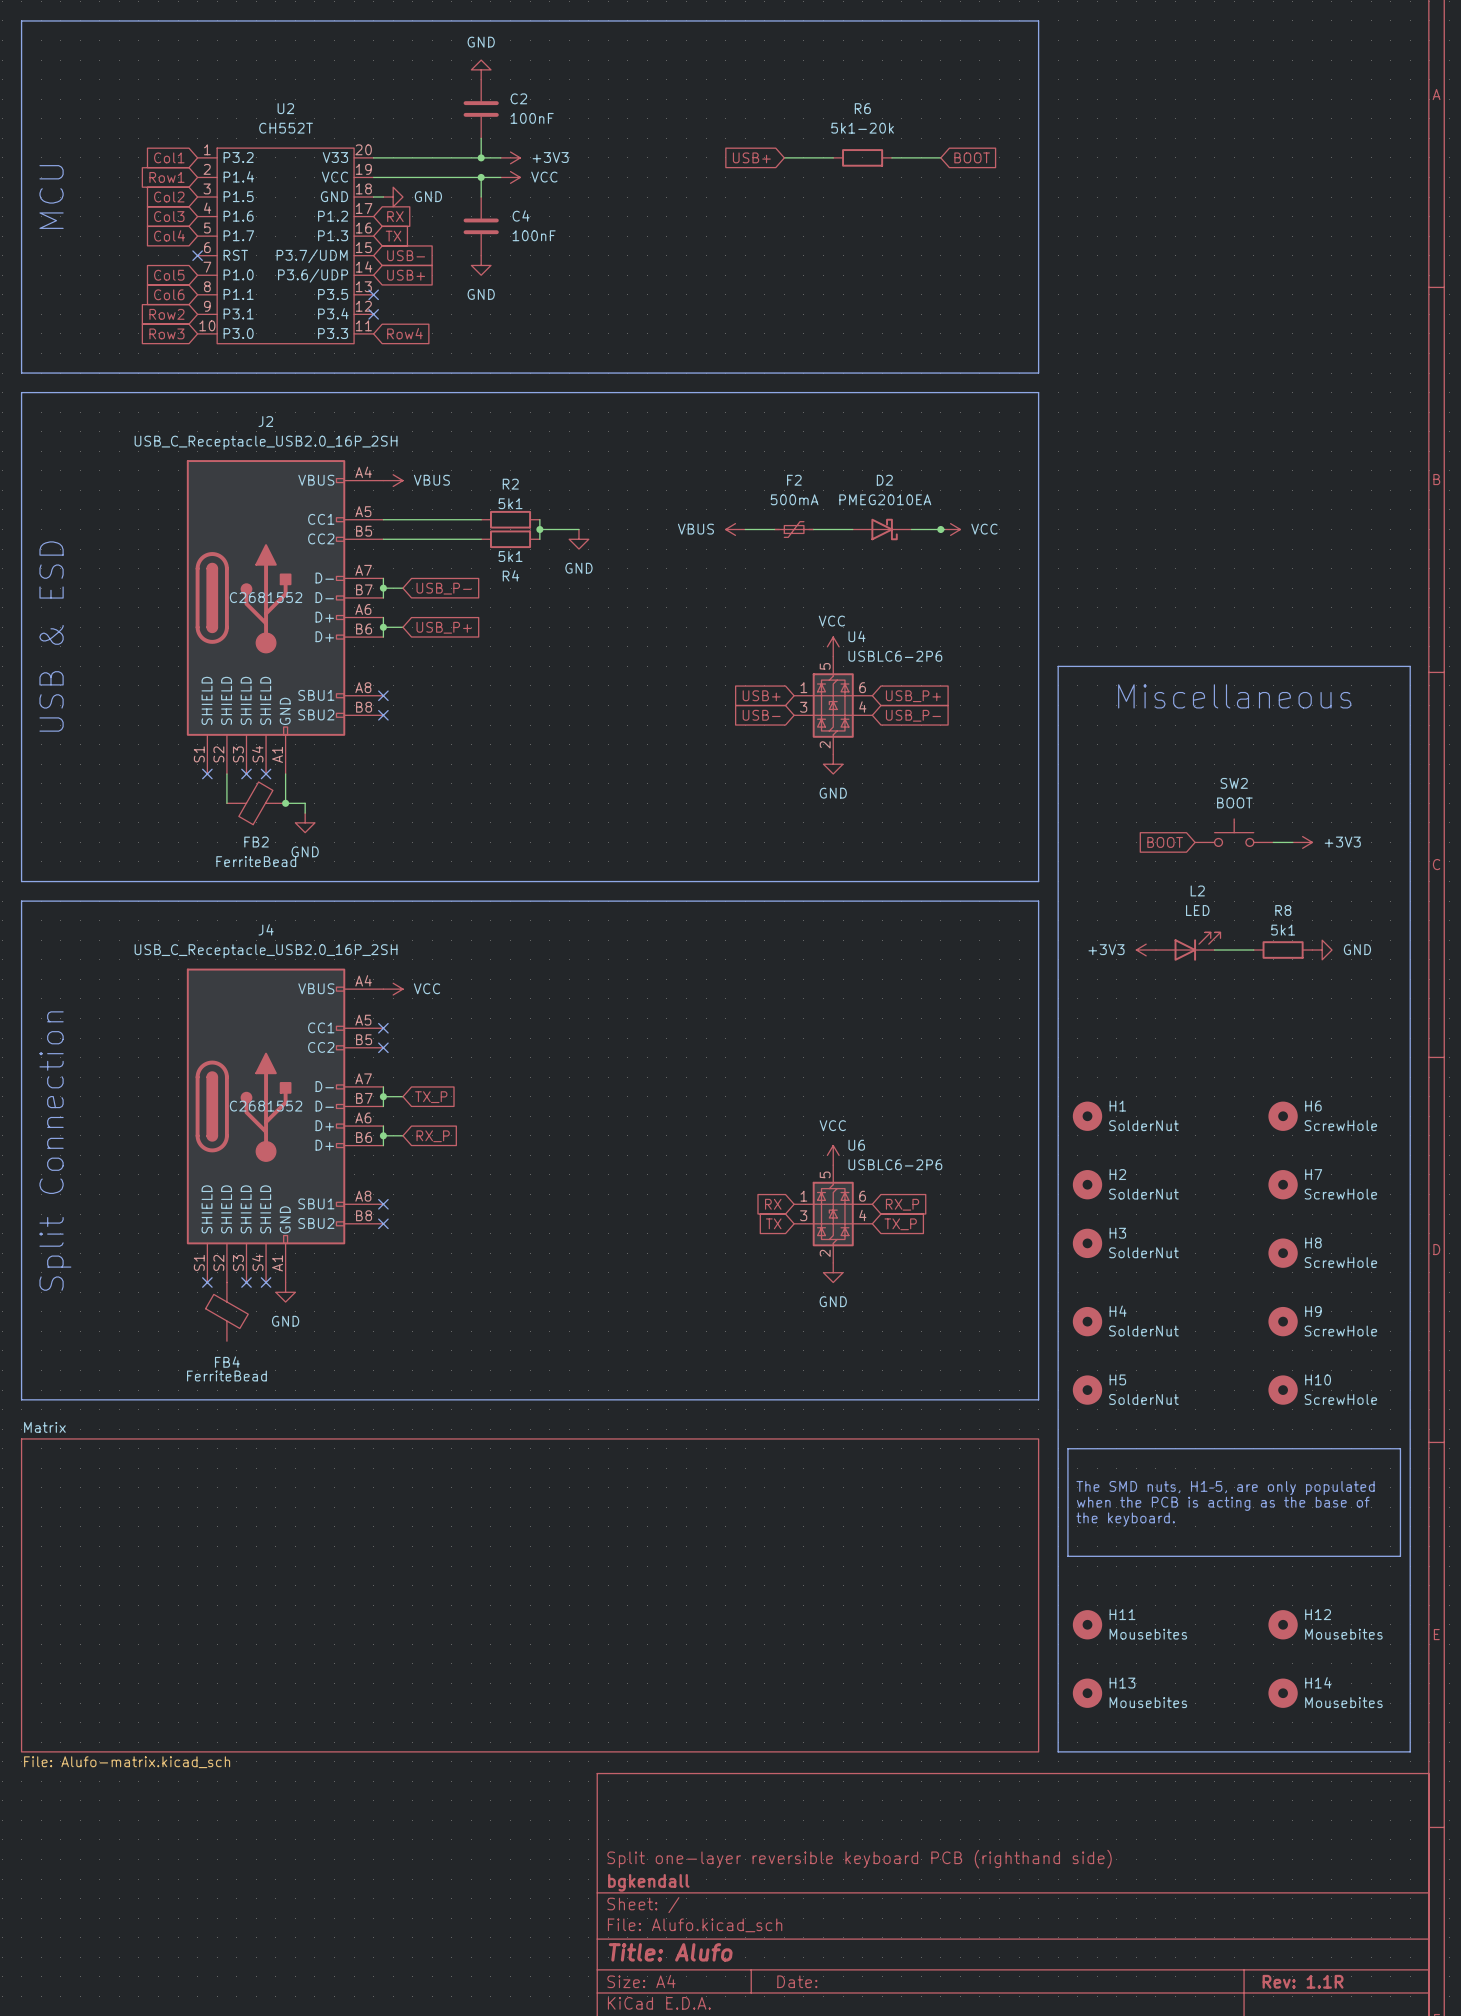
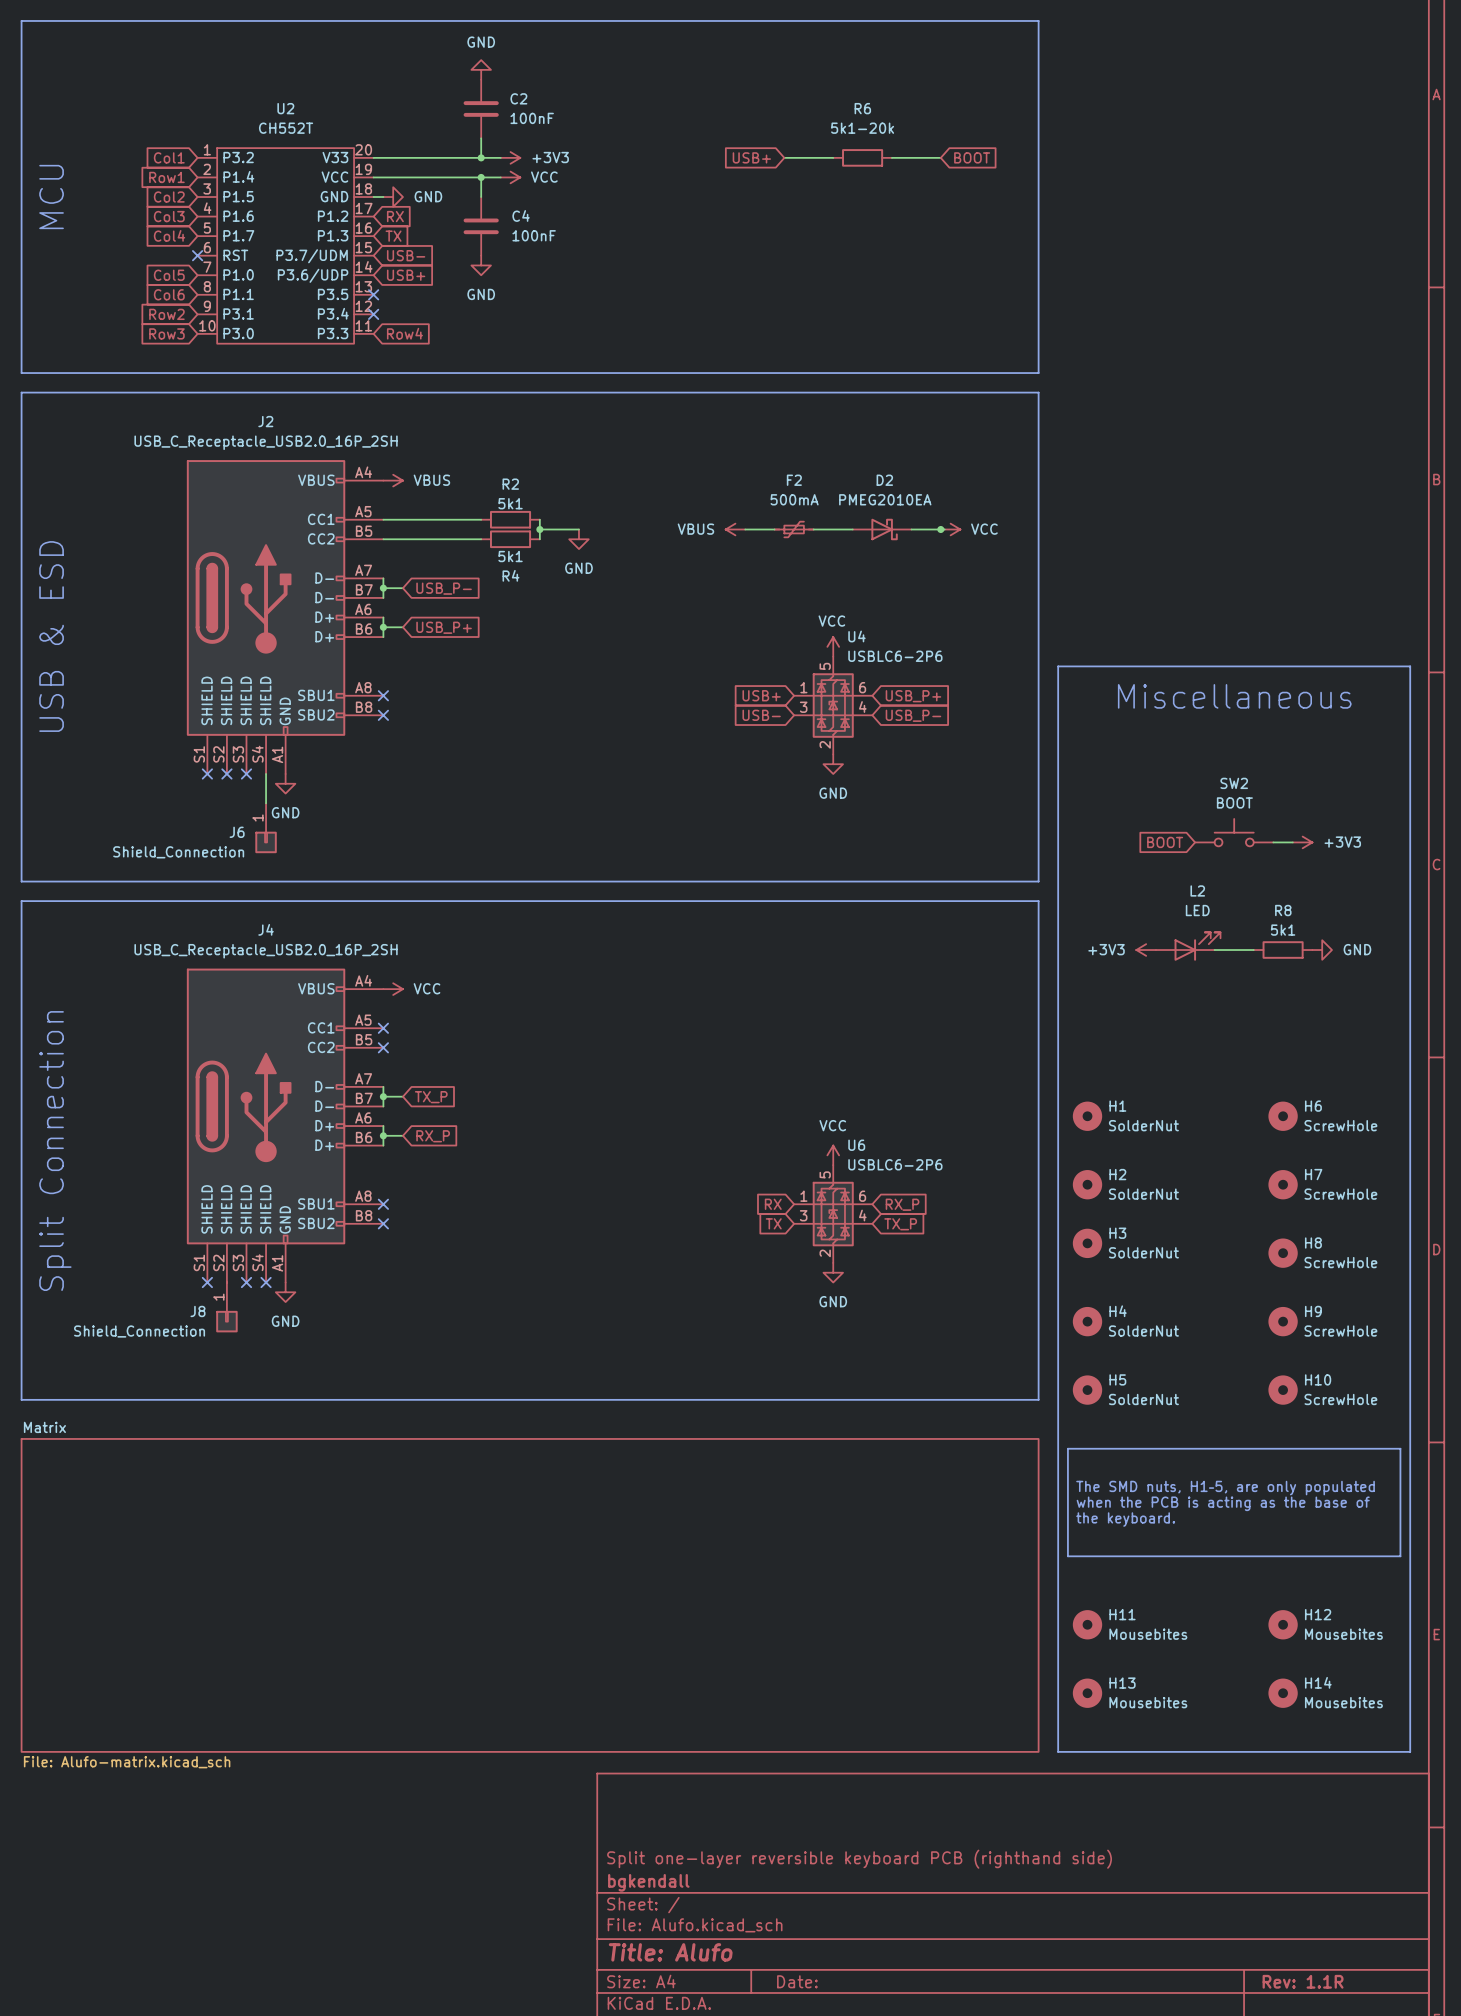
J2 text: C2681552 (266, 597) -> none
wire: (226, 773) (226, 803) -> (266, 773) (266, 803)
no-connect mark position: (266, 773) -> (226, 773)
wire: (285, 773) (285, 803) (305, 803) (305, 813) -> none
FB2: FerriteBead (256, 803) -> none
junction: (285, 803) -> none
power symbol position: GND (305, 822) -> GND (285, 783)
J6: none -> Shield_Connection (266, 828)
J4 text: C2681552 (266, 1106) -> none
J8: none -> Shield_Connection (226, 1307)
FB4: FerriteBead (226, 1311) -> none

